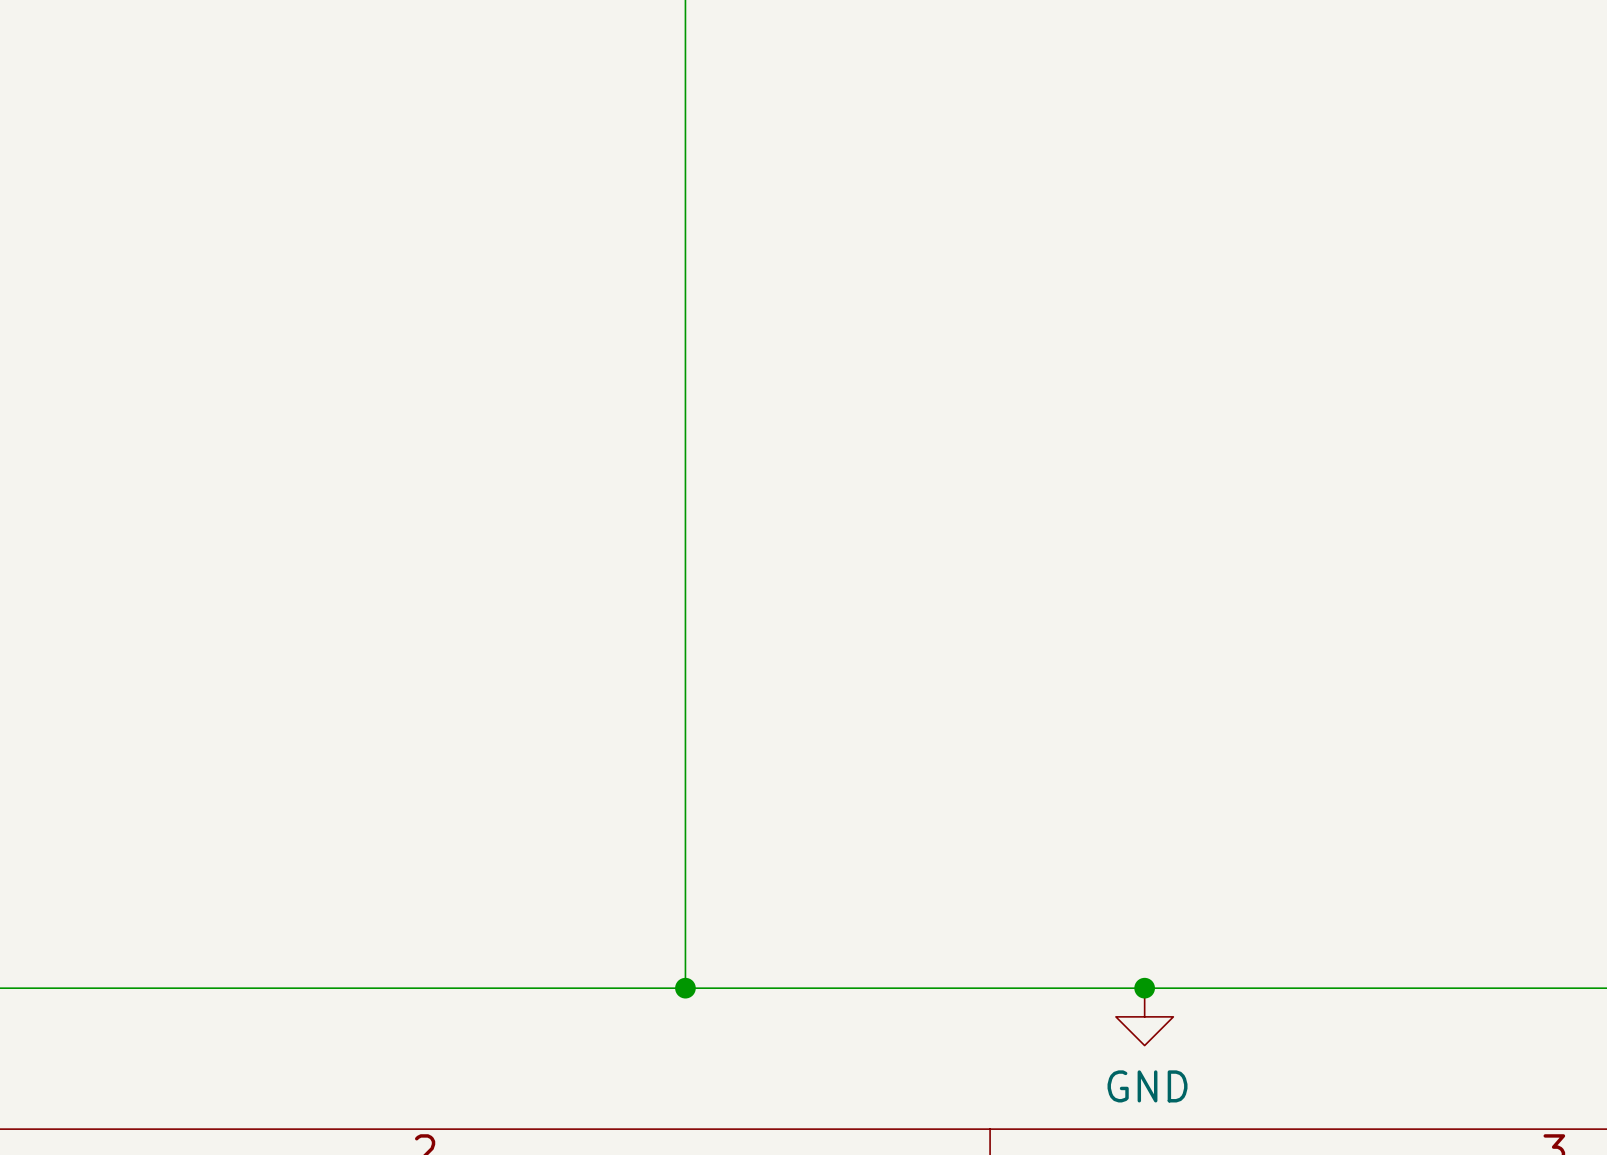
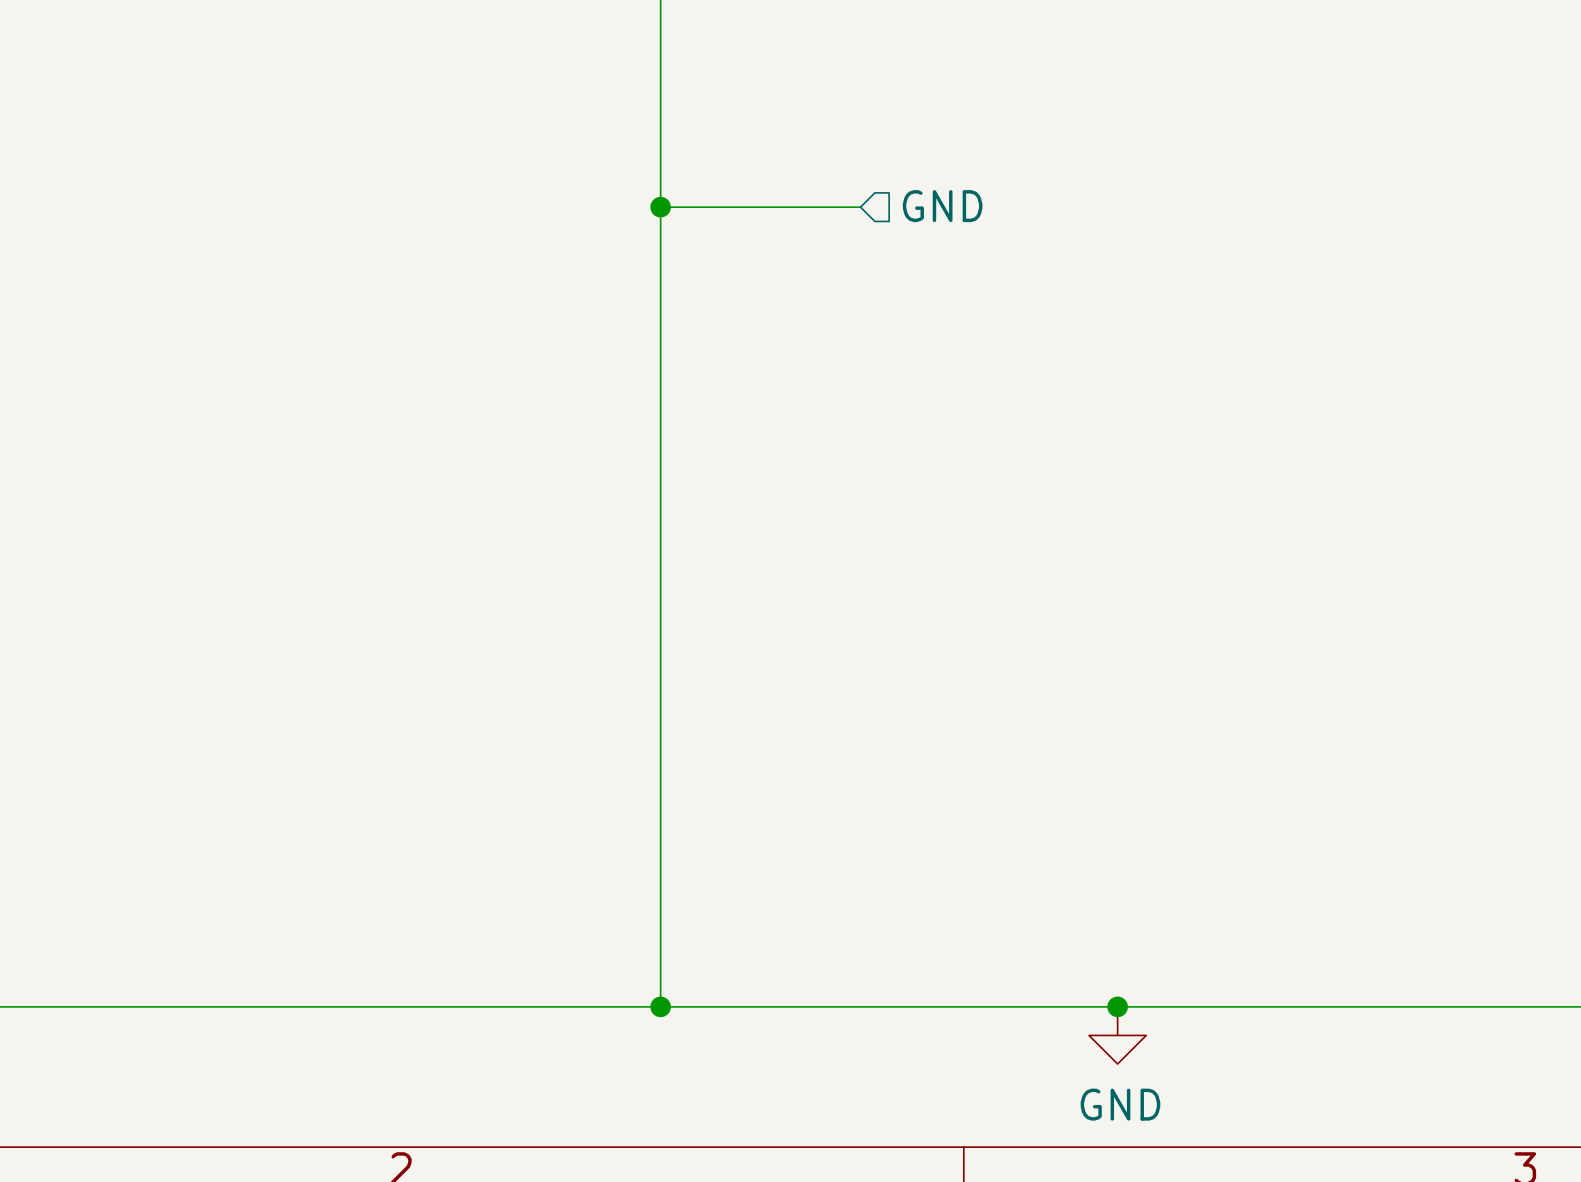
sheet pin: none -> GND (942, 206)
wire: none -> (660, 207) (860, 207)
junction: none -> (660, 207)

